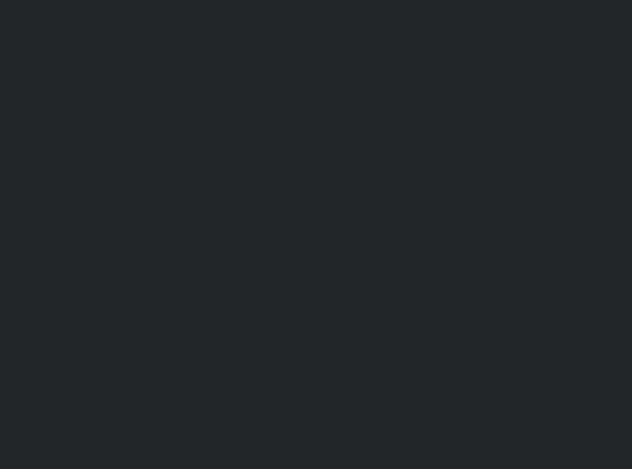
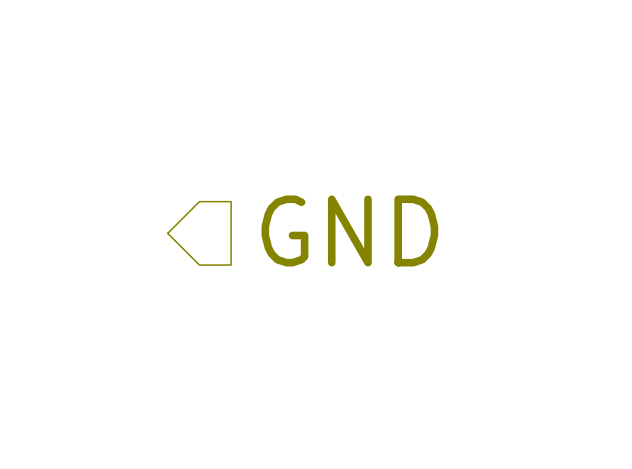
hierarchical label: none -> GND (349, 230)

